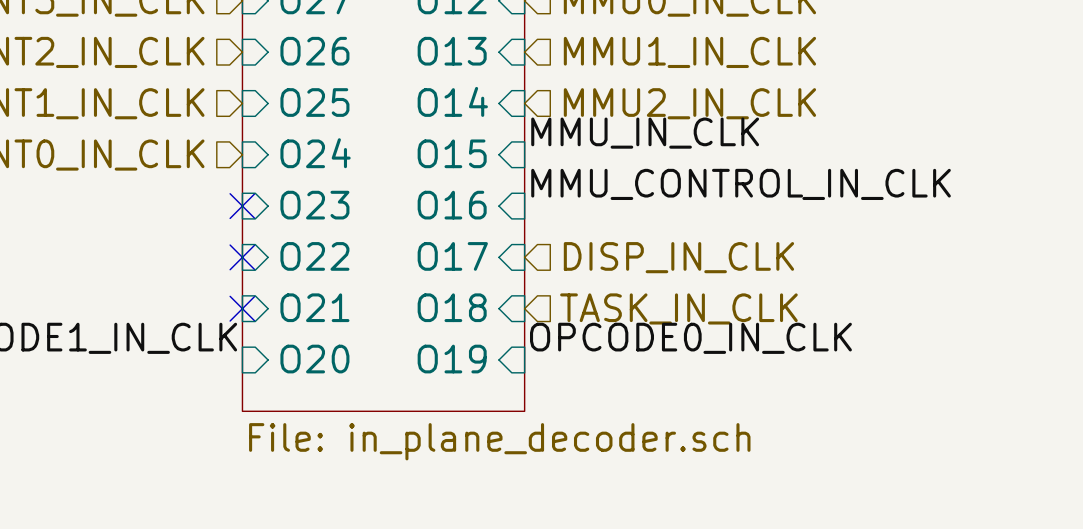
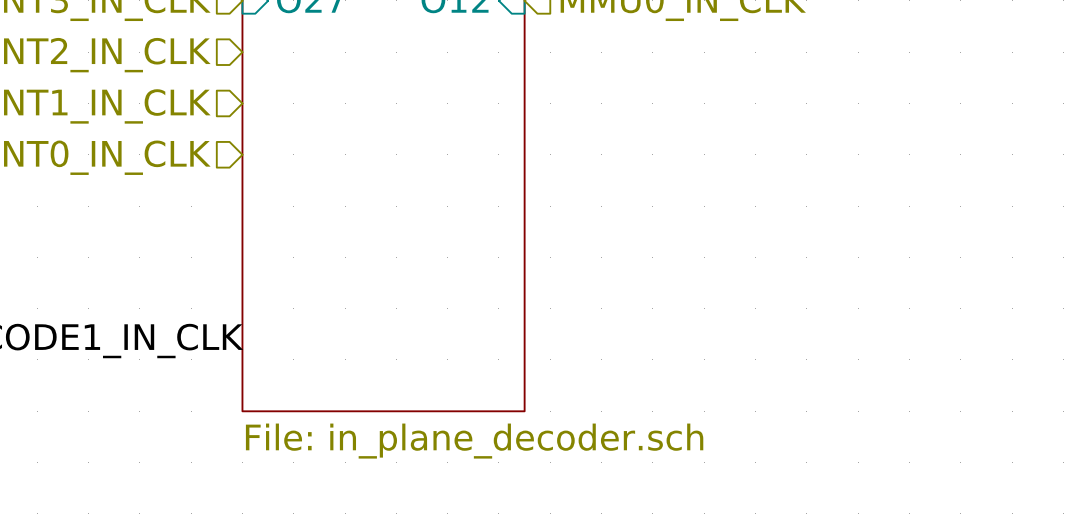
sheet pin: O26 (314, 51) -> none
sheet pin: O13 (452, 51) -> none
hierarchical label: MMU1_IN_CLK (689, 52) -> none
sheet pin: O14 (452, 101) -> none
sheet pin: O25 (314, 102) -> none
hierarchical label: MMU2_IN_CLK (689, 103) -> none
label: MMU_IN_CLK (645, 133) -> none
sheet pin: O24 (315, 153) -> none
sheet pin: O15 (452, 153) -> none
label: MMU_CONTROL_IN_CLK (741, 184) -> none
sheet pin: O23 (314, 205) -> none
sheet pin: O16 (452, 205) -> none
no-connect mark: (242, 206) -> none
sheet pin: O22 (314, 256) -> none
sheet pin: O17 (452, 256) -> none
no-connect mark: (242, 257) -> none
hierarchical label: DISP_IN_CLK (678, 257) -> none
sheet pin: O21 (314, 307) -> none
sheet pin: O18 (452, 307) -> none
no-connect mark: (242, 308) -> none
hierarchical label: TASK_IN_CLK (678, 308) -> none
label: OPCODE0_IN_CLK (690, 338) -> none
sheet pin: O20 (314, 359) -> none
sheet pin: O19 (452, 359) -> none

